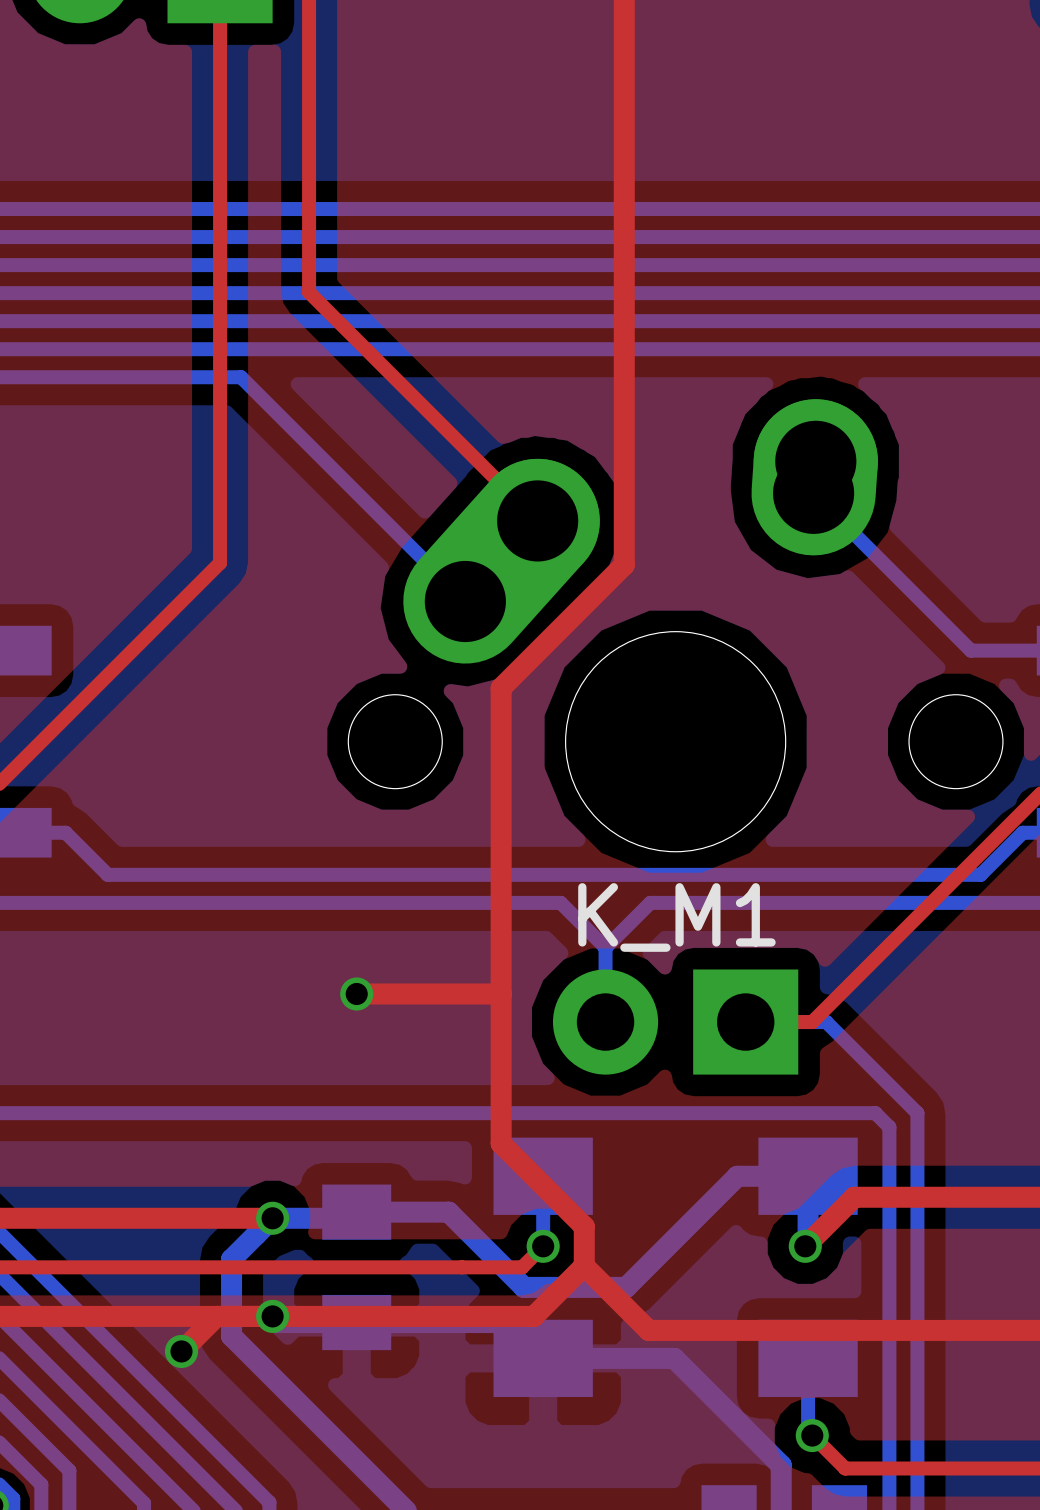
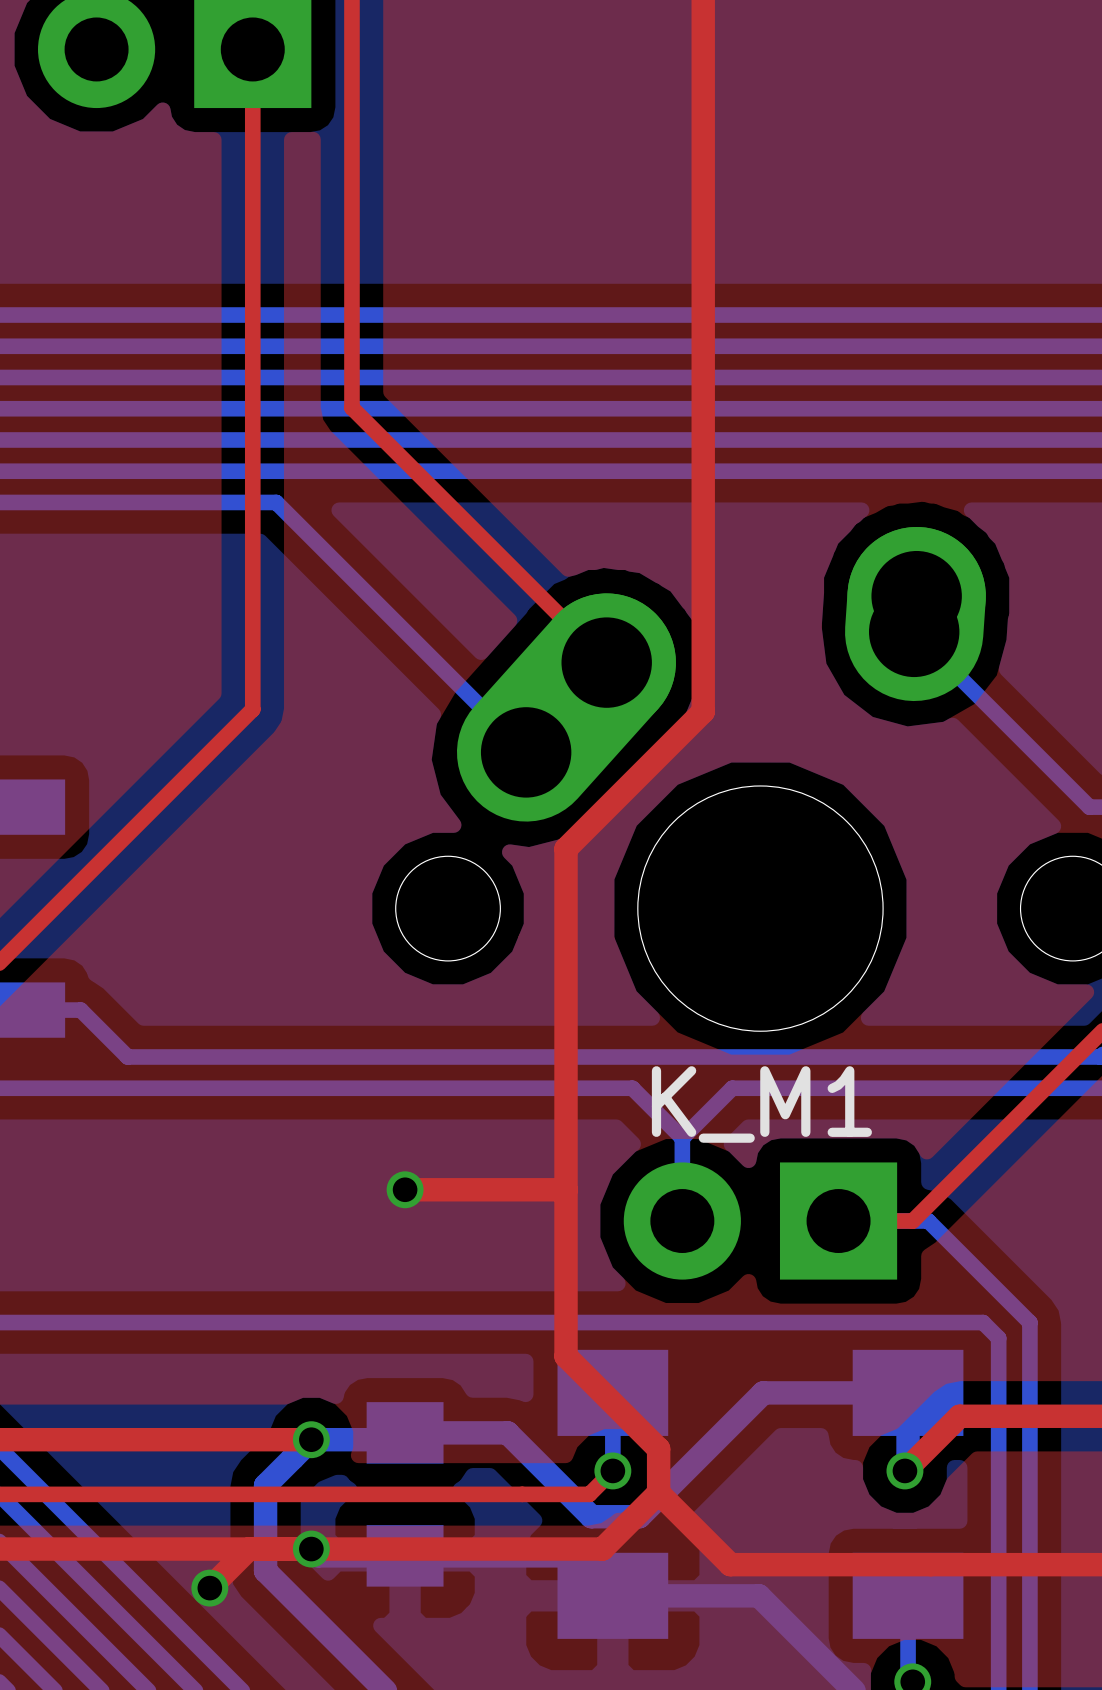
bottom track: (737, 1176) (626, 1287) (566, 1287) -> (829, 1392) (763, 1392) (639, 1516)

